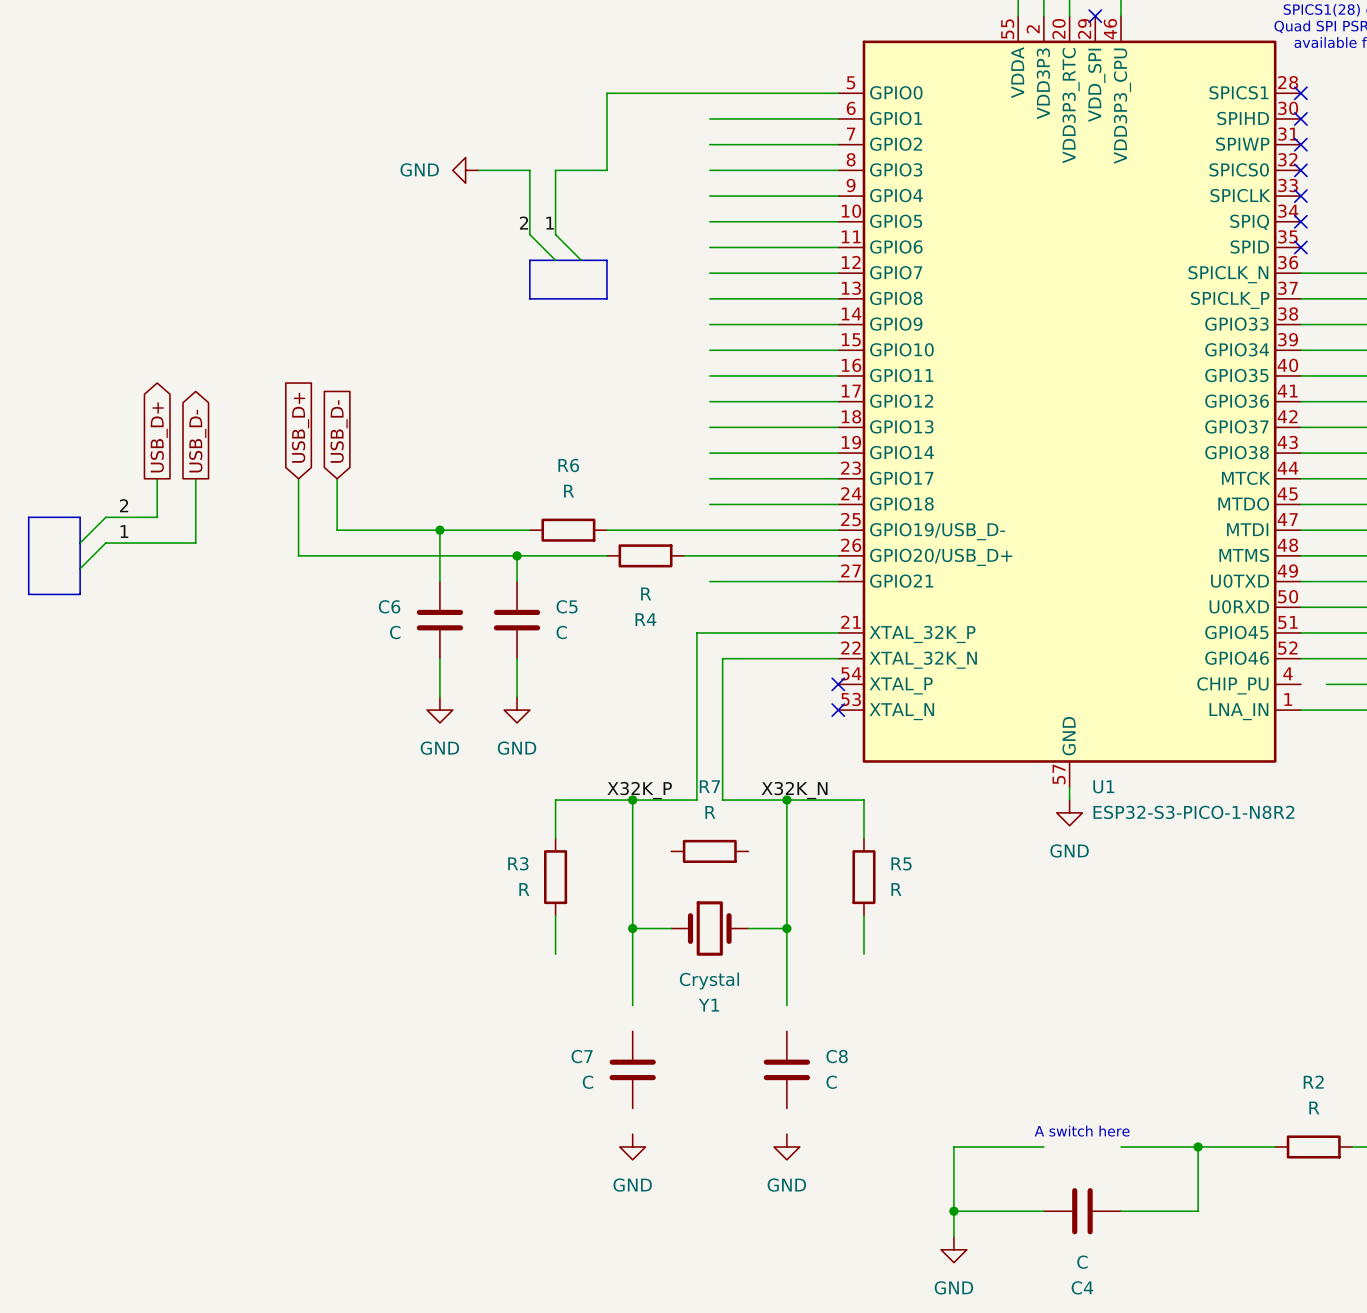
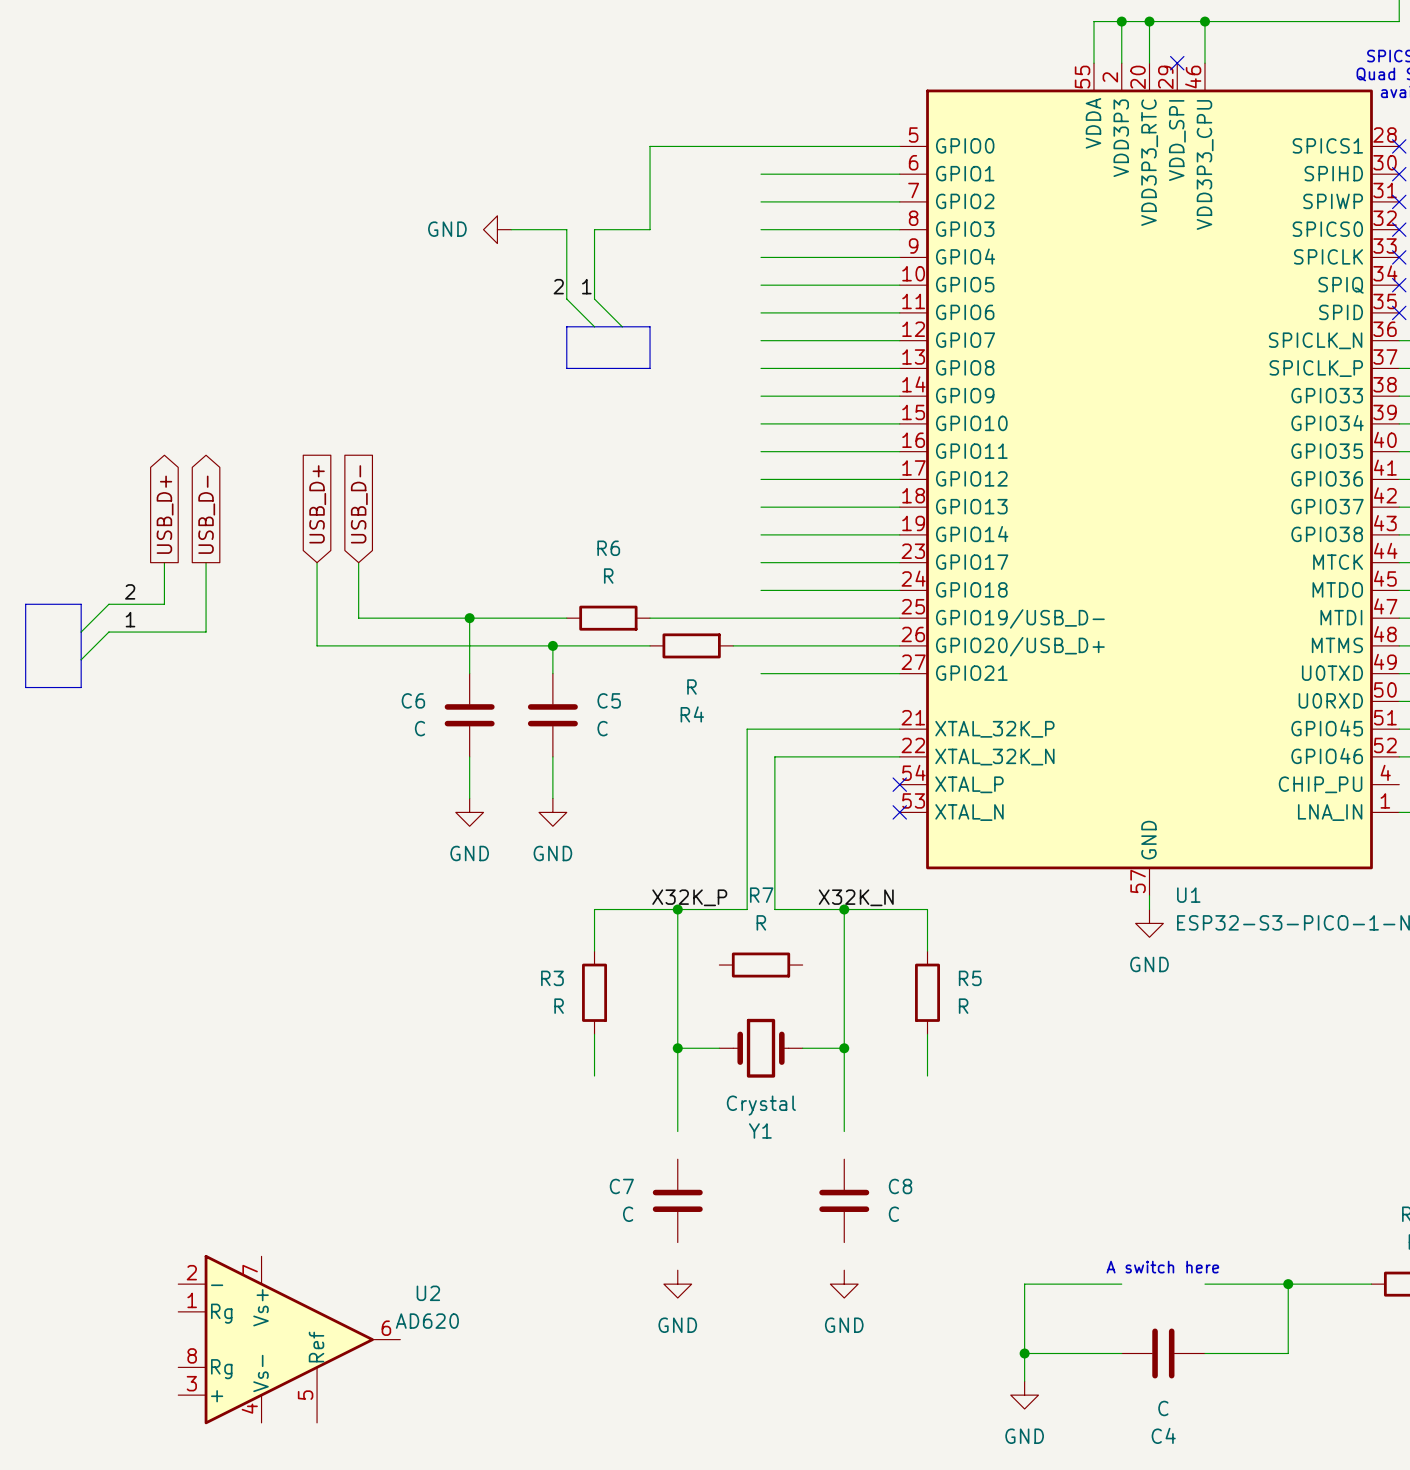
U2: none -> AD620 (289, 1339)

